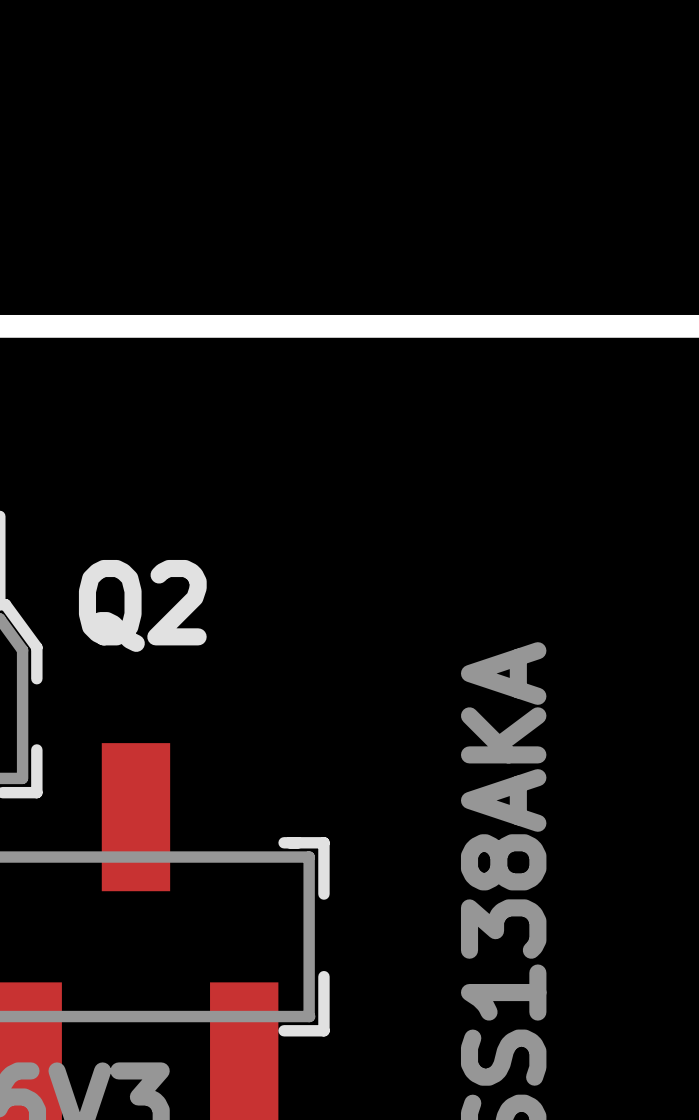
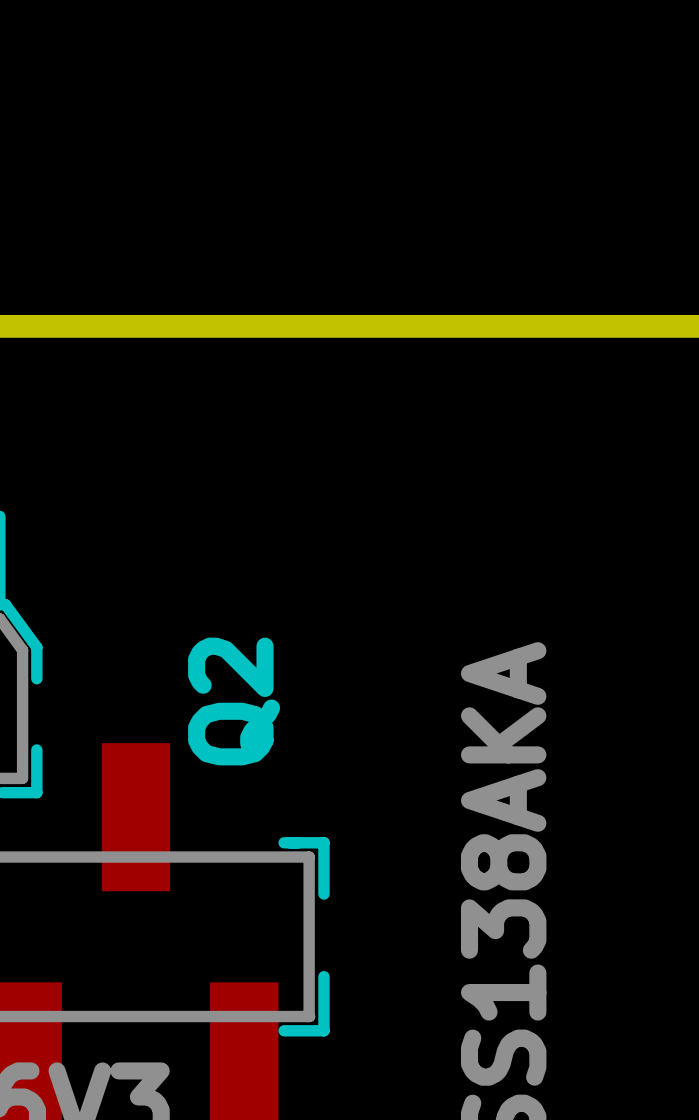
Q2 name rotation: 0° (142, 605) -> 90° counterclockwise (234, 701)

